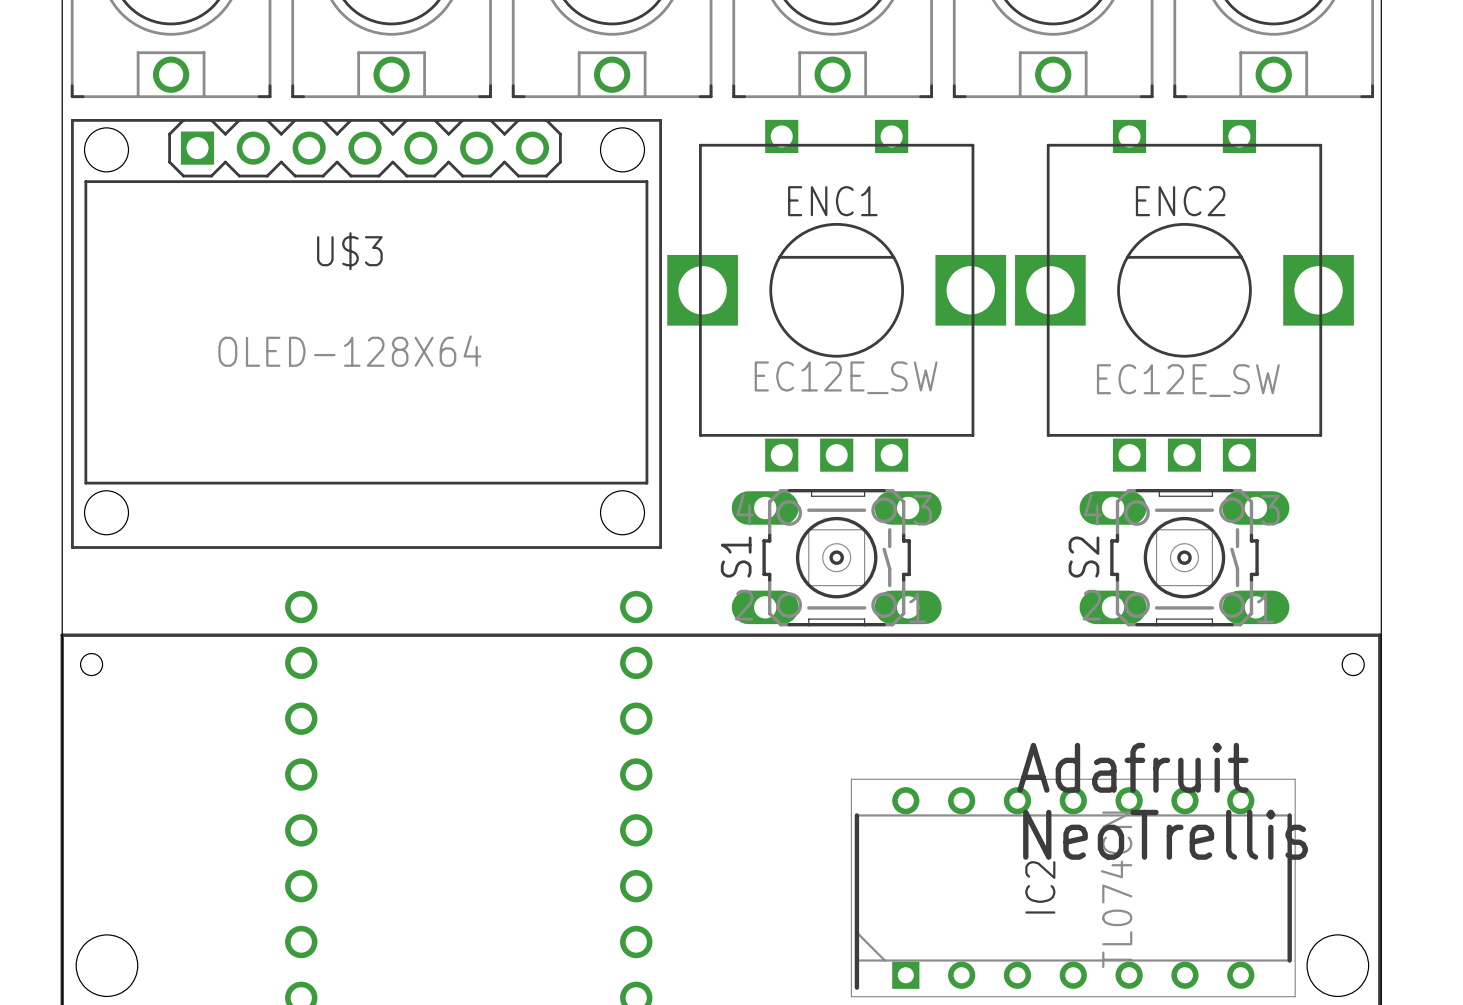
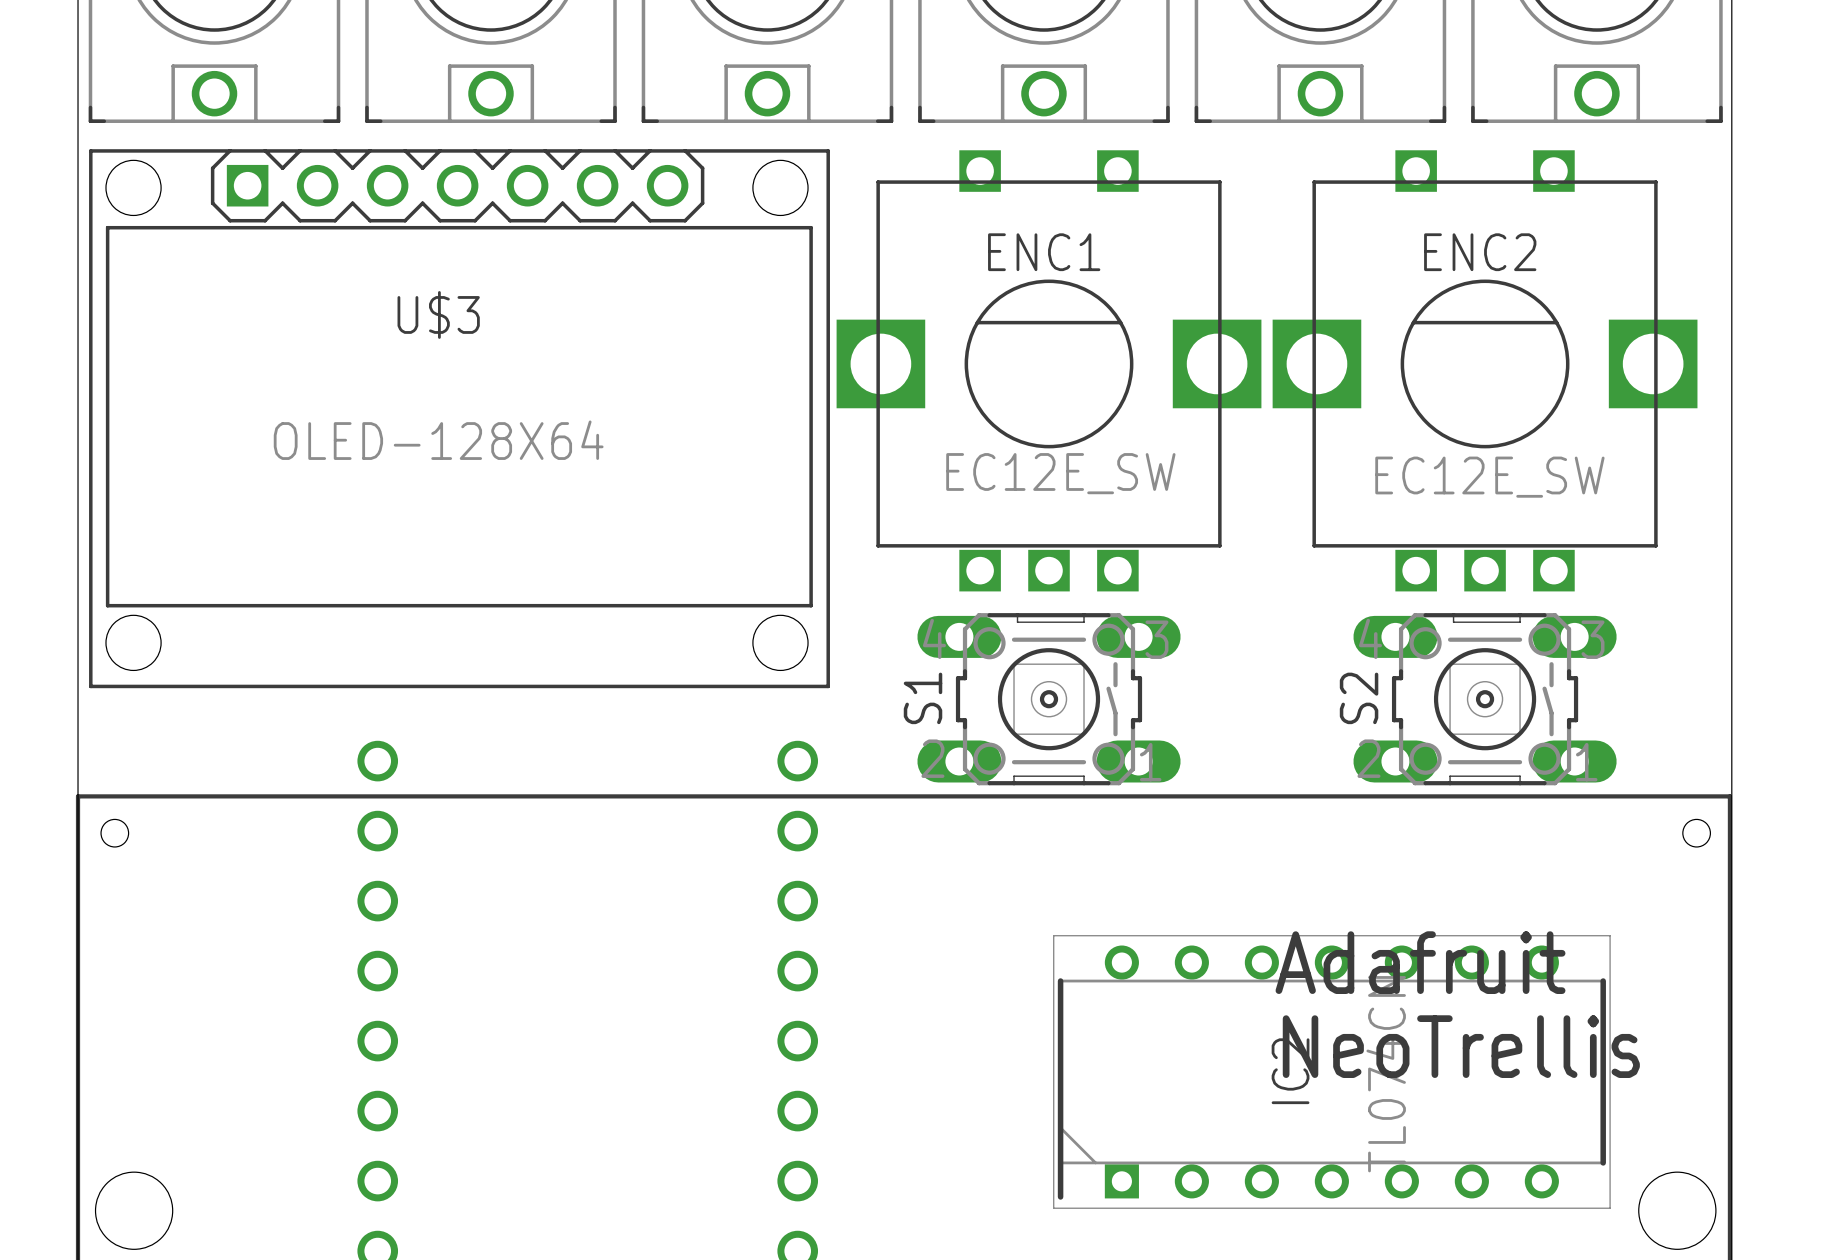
IC2 position: (1073, 887) -> (1331, 1071)

